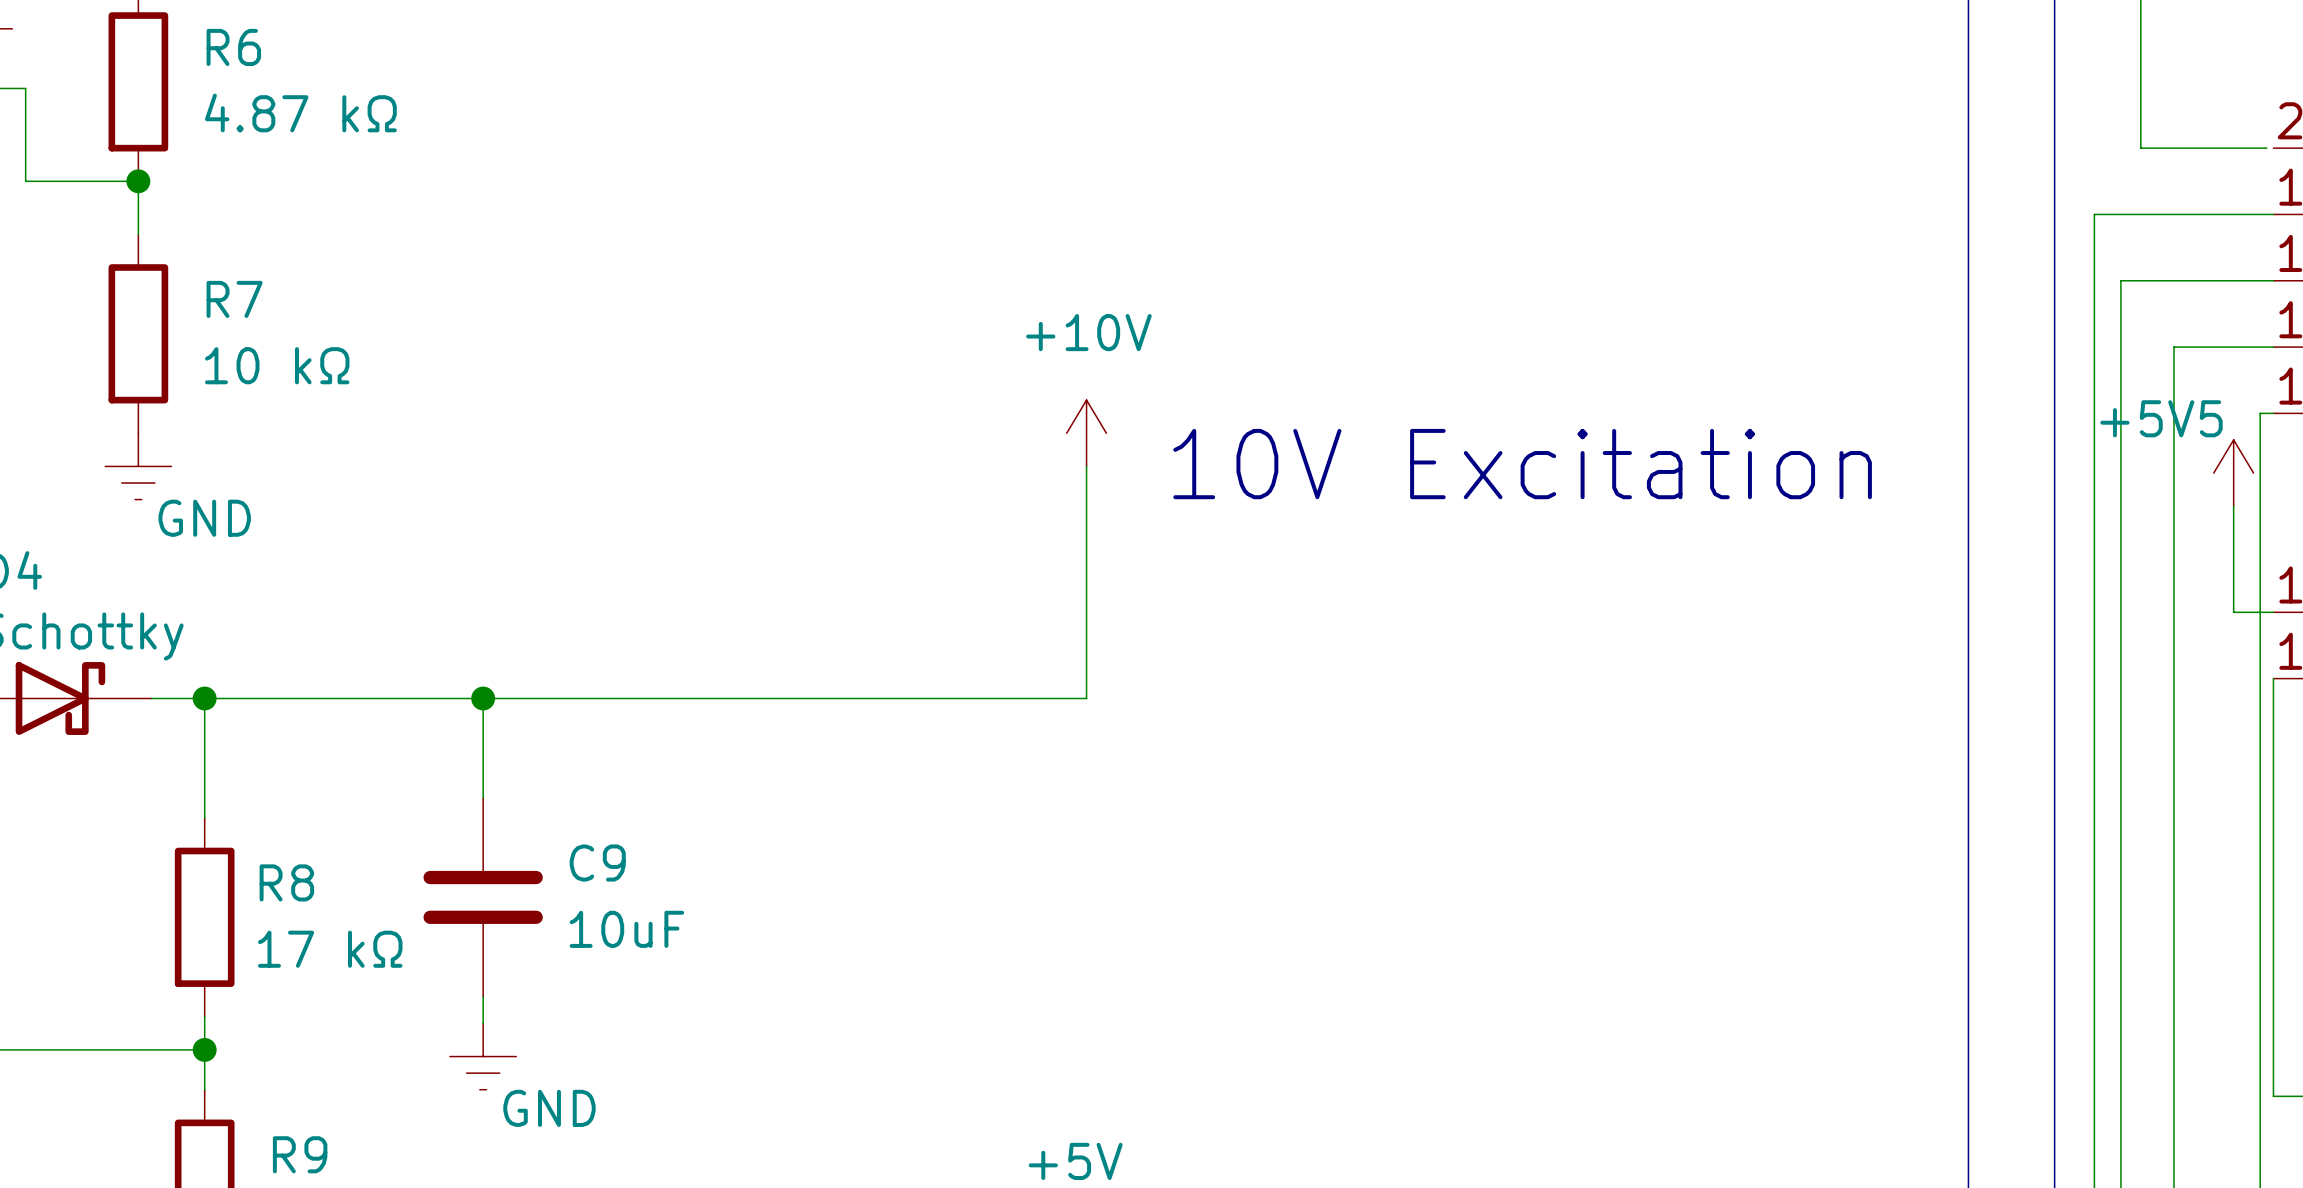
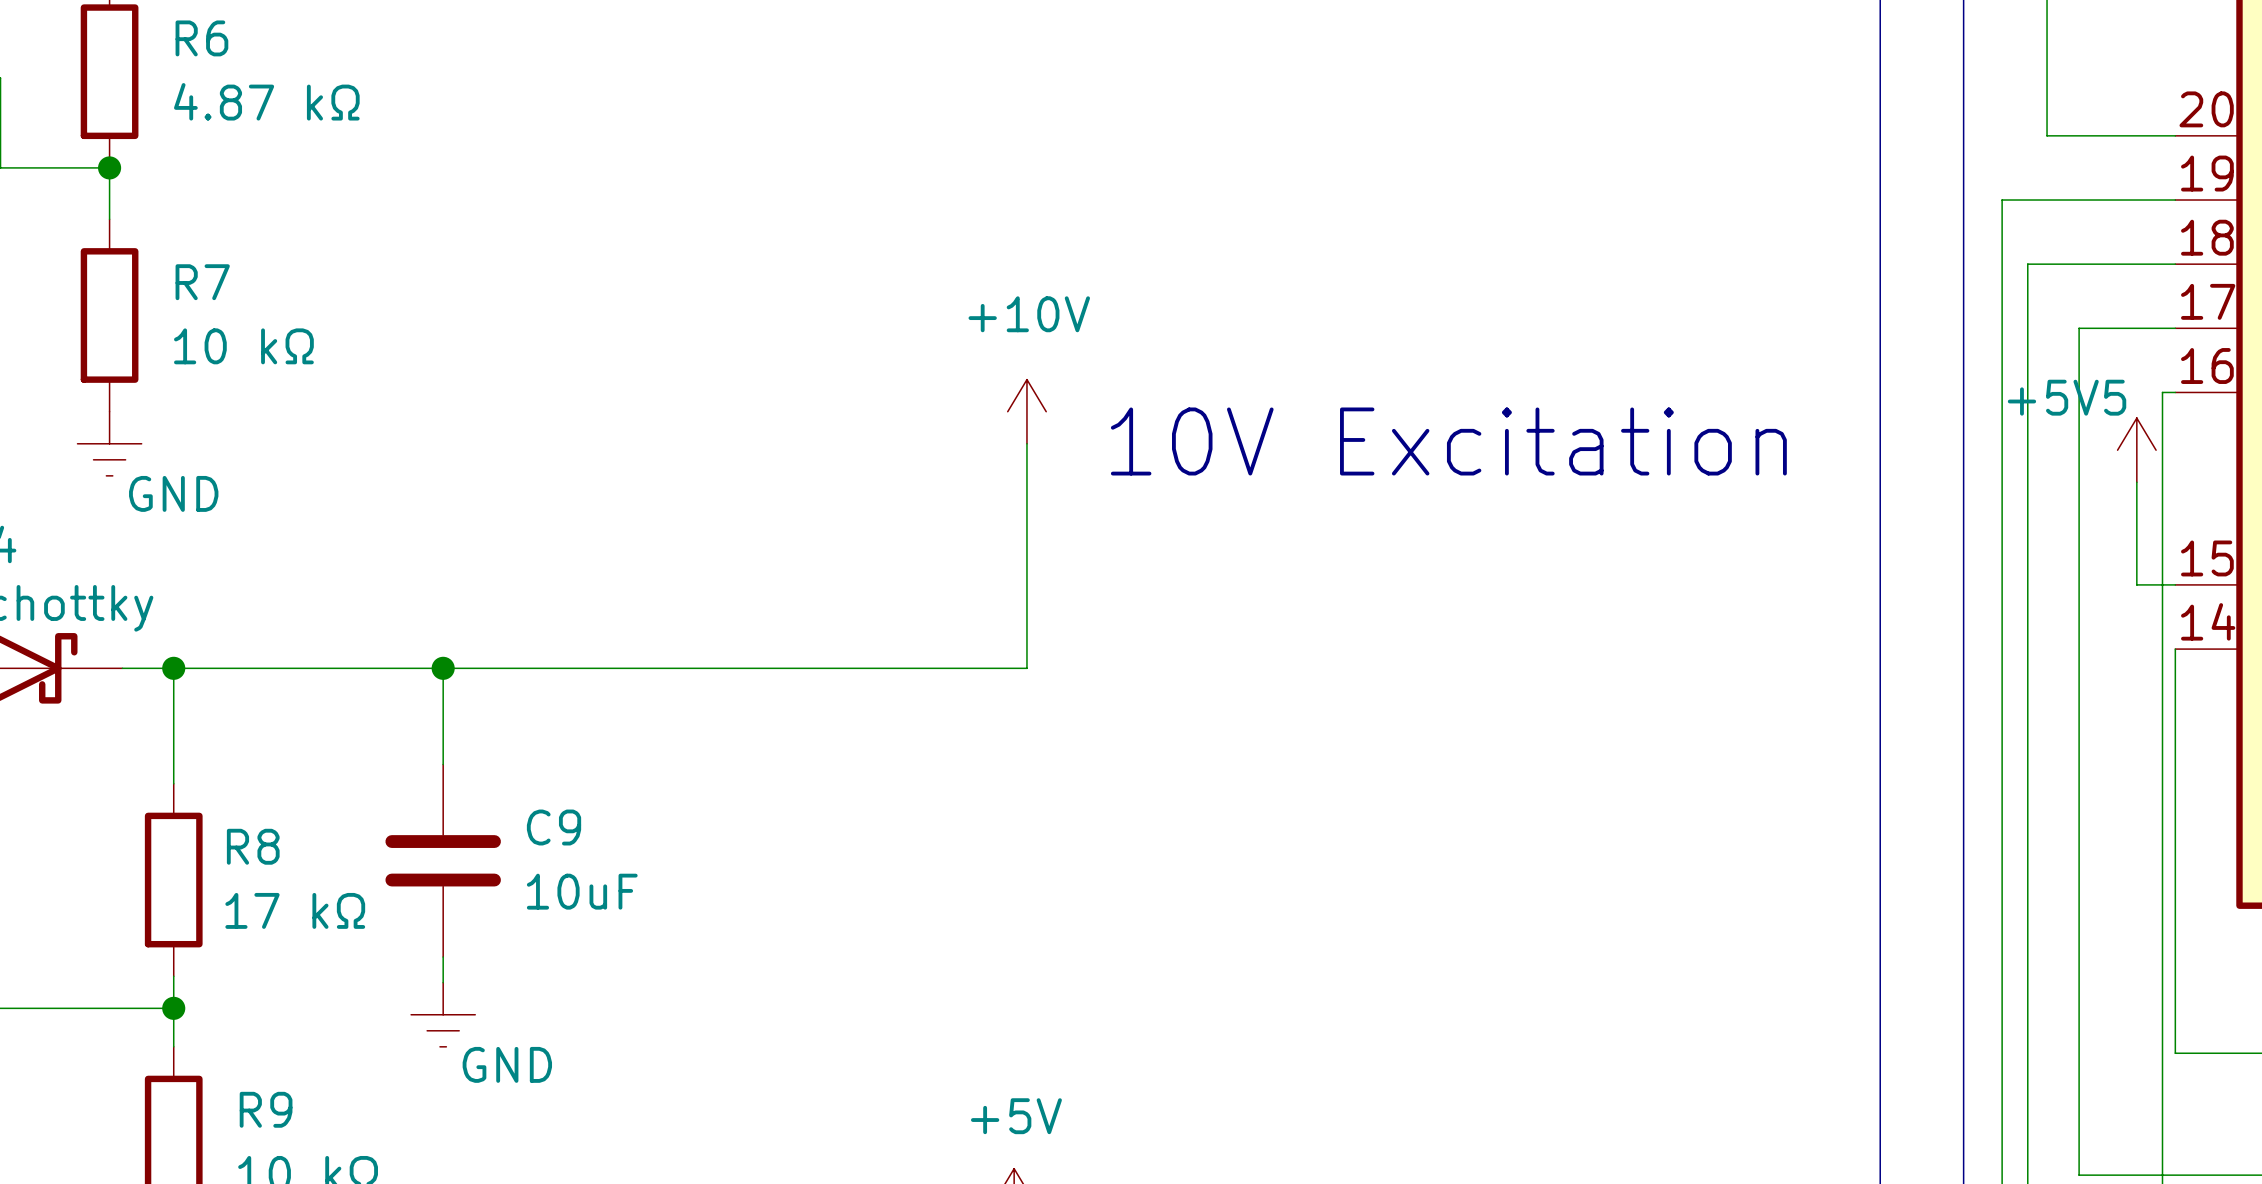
wire: none -> (2168, 135) (2175, 135)

